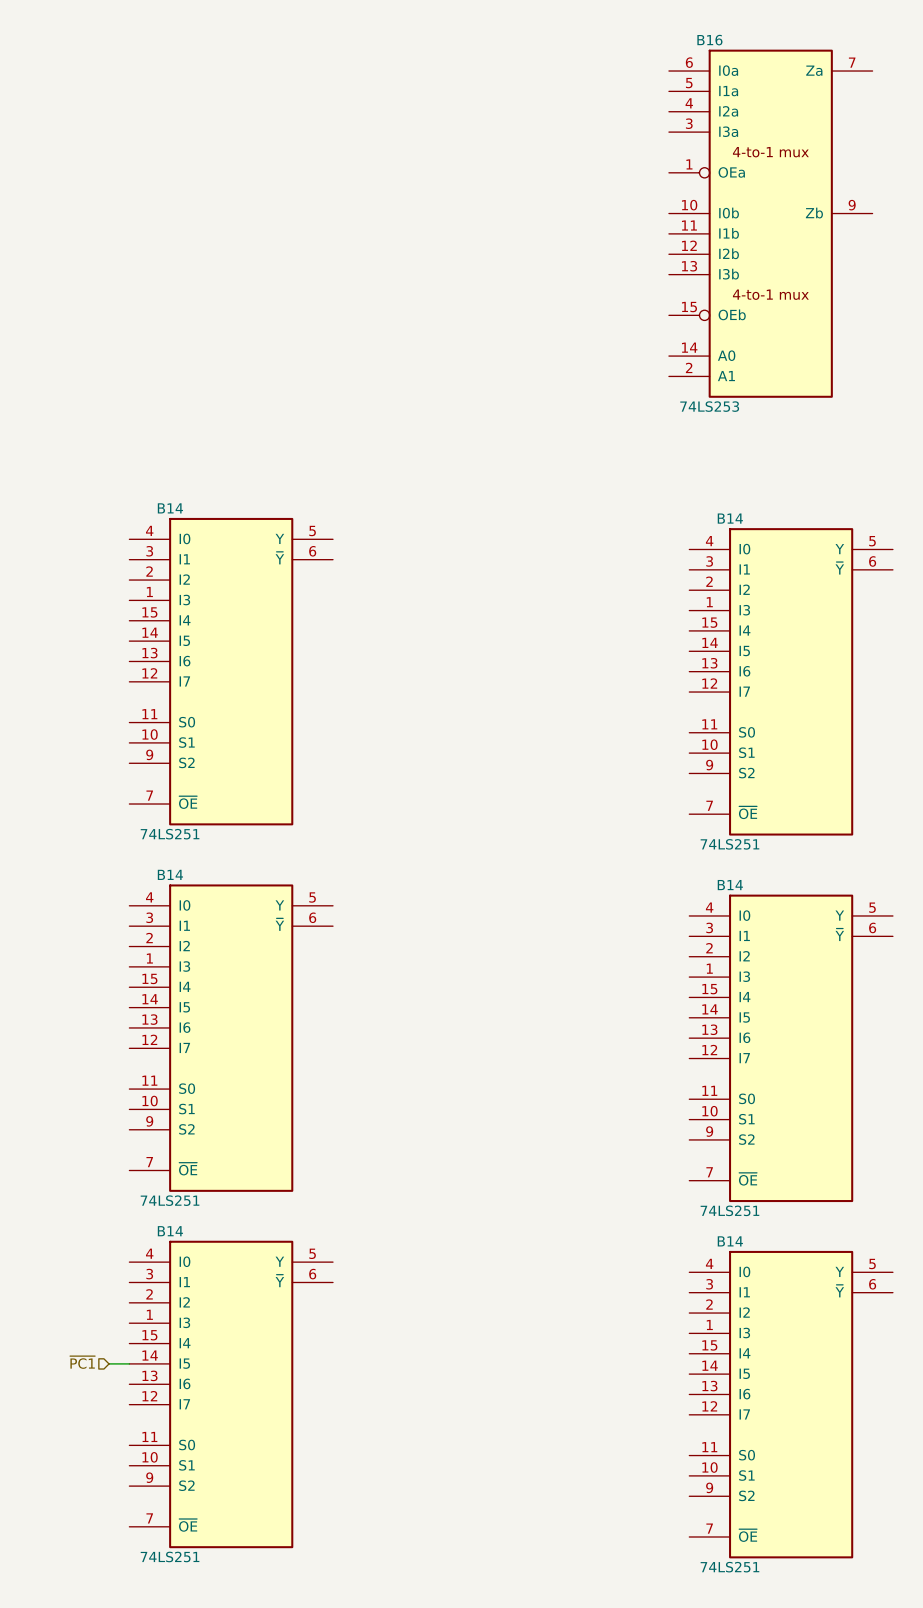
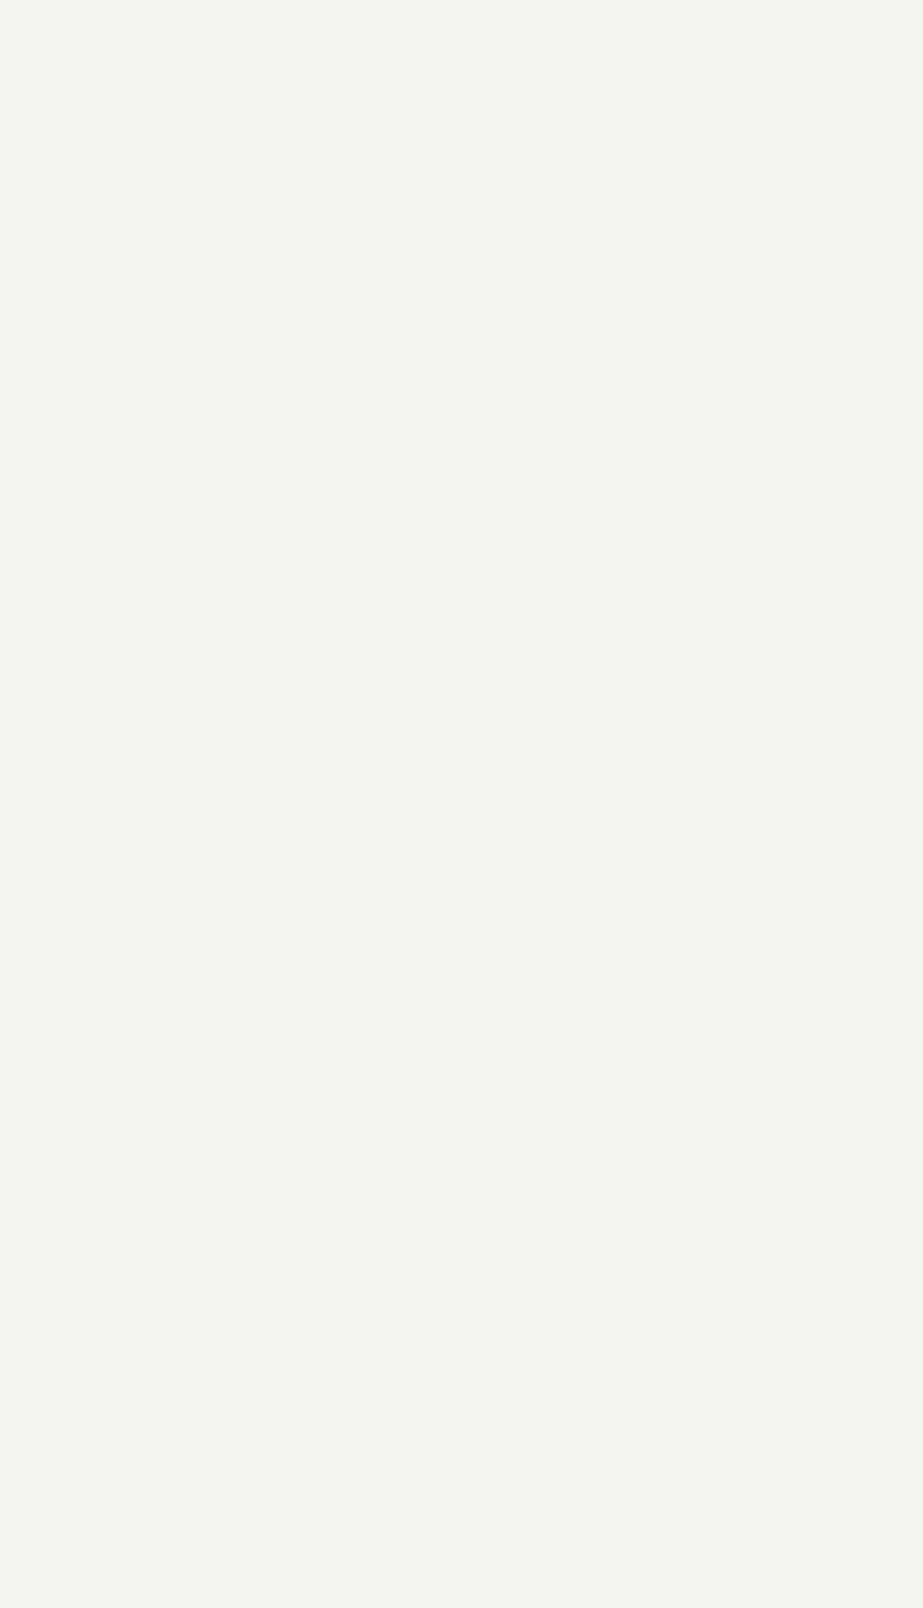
B16: 74LS253 (770, 223) -> none
B14: 74LS251 (231, 671) -> none
B14: 74LS251 (791, 681) -> none
B14: 74LS251 (231, 1038) -> none
B14: 74LS251 (791, 1048) -> none
hierarchical label: ~{PC1} (82, 1362) -> none
wire: (109, 1363) (129, 1363) -> none
B14: 74LS251 (231, 1394) -> none
B14: 74LS251 (791, 1404) -> none

